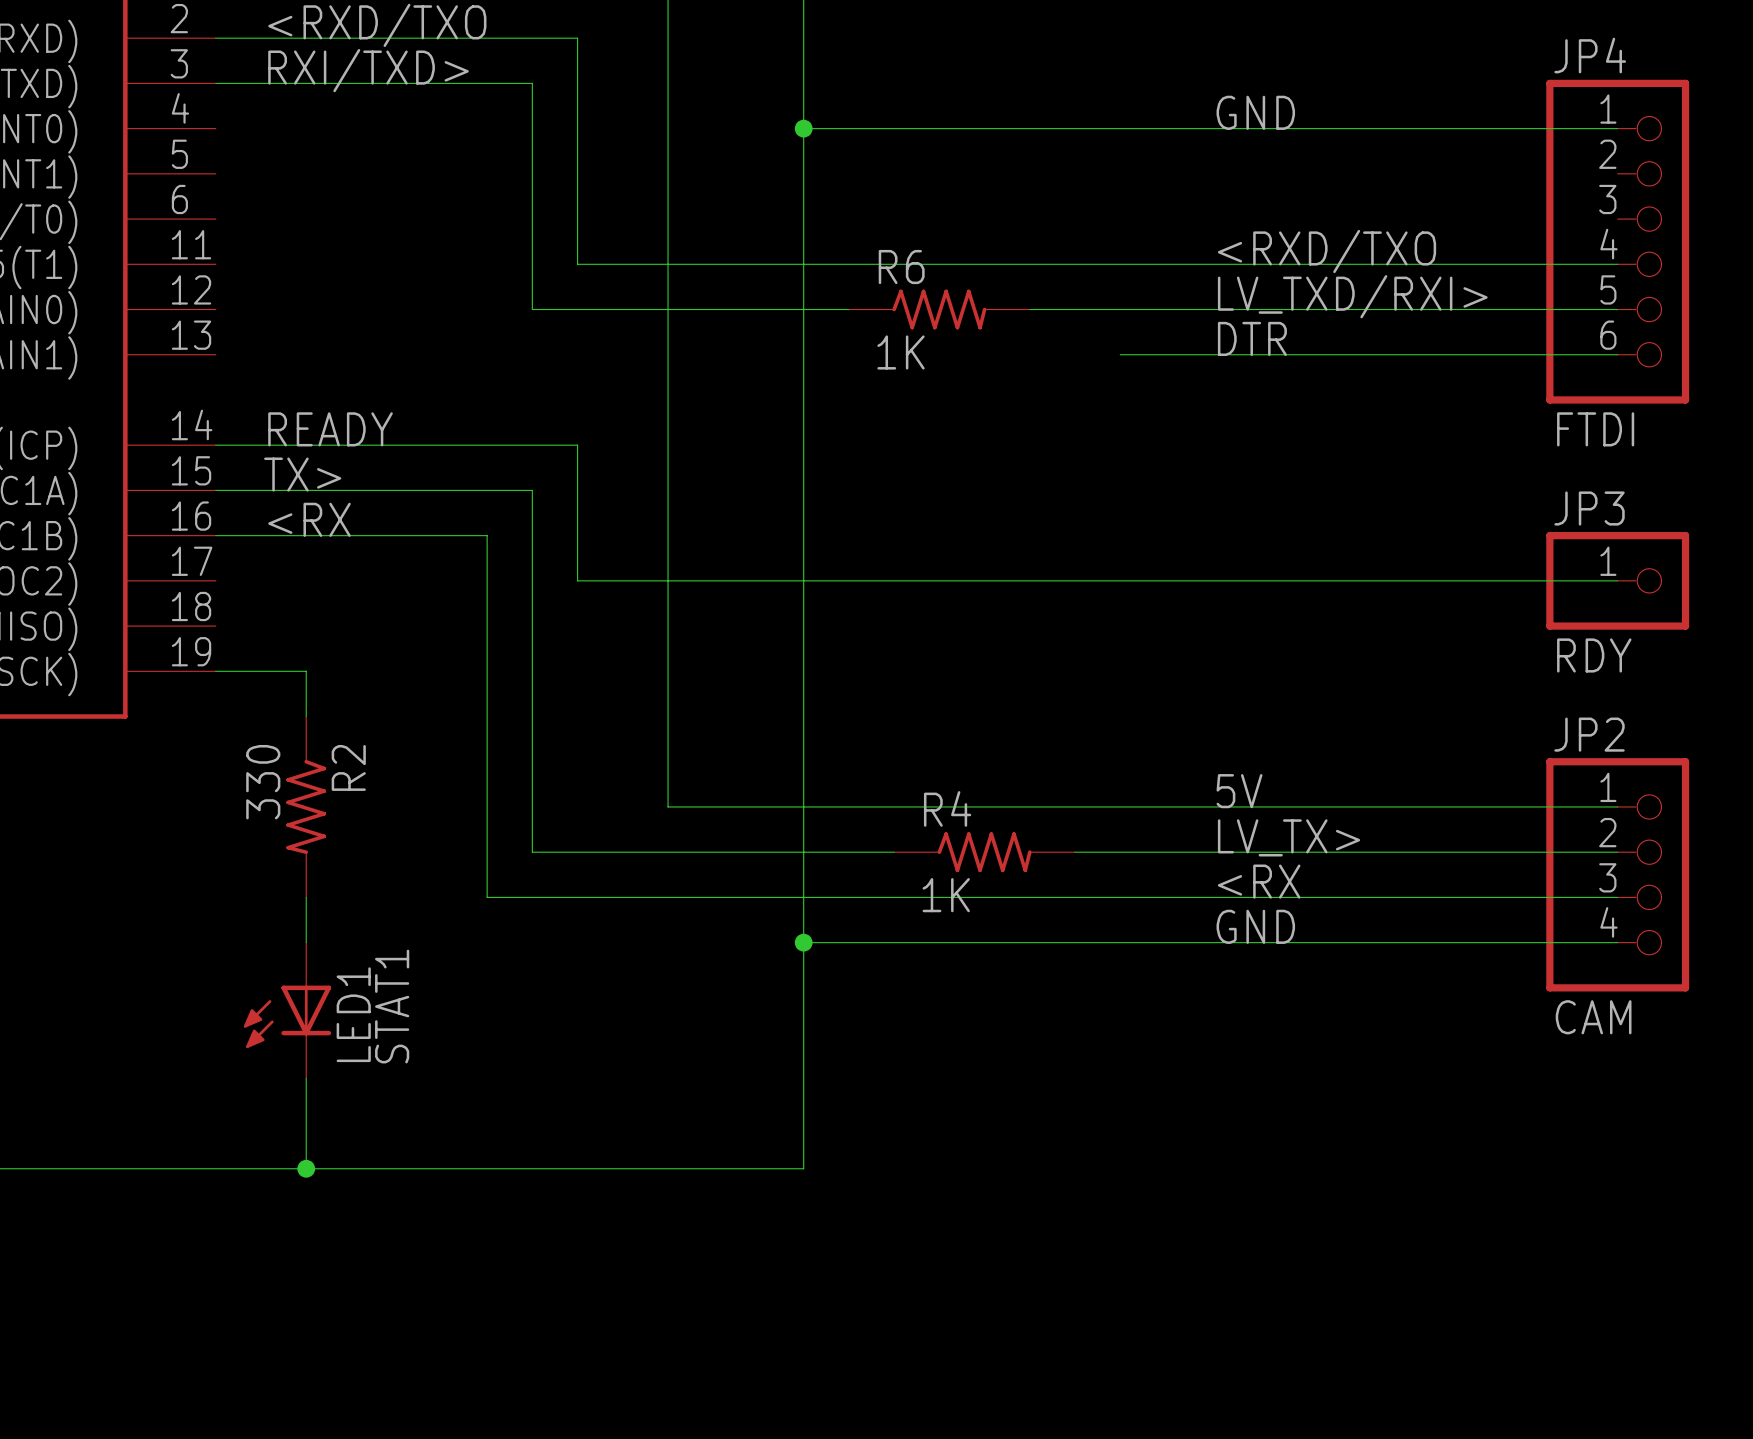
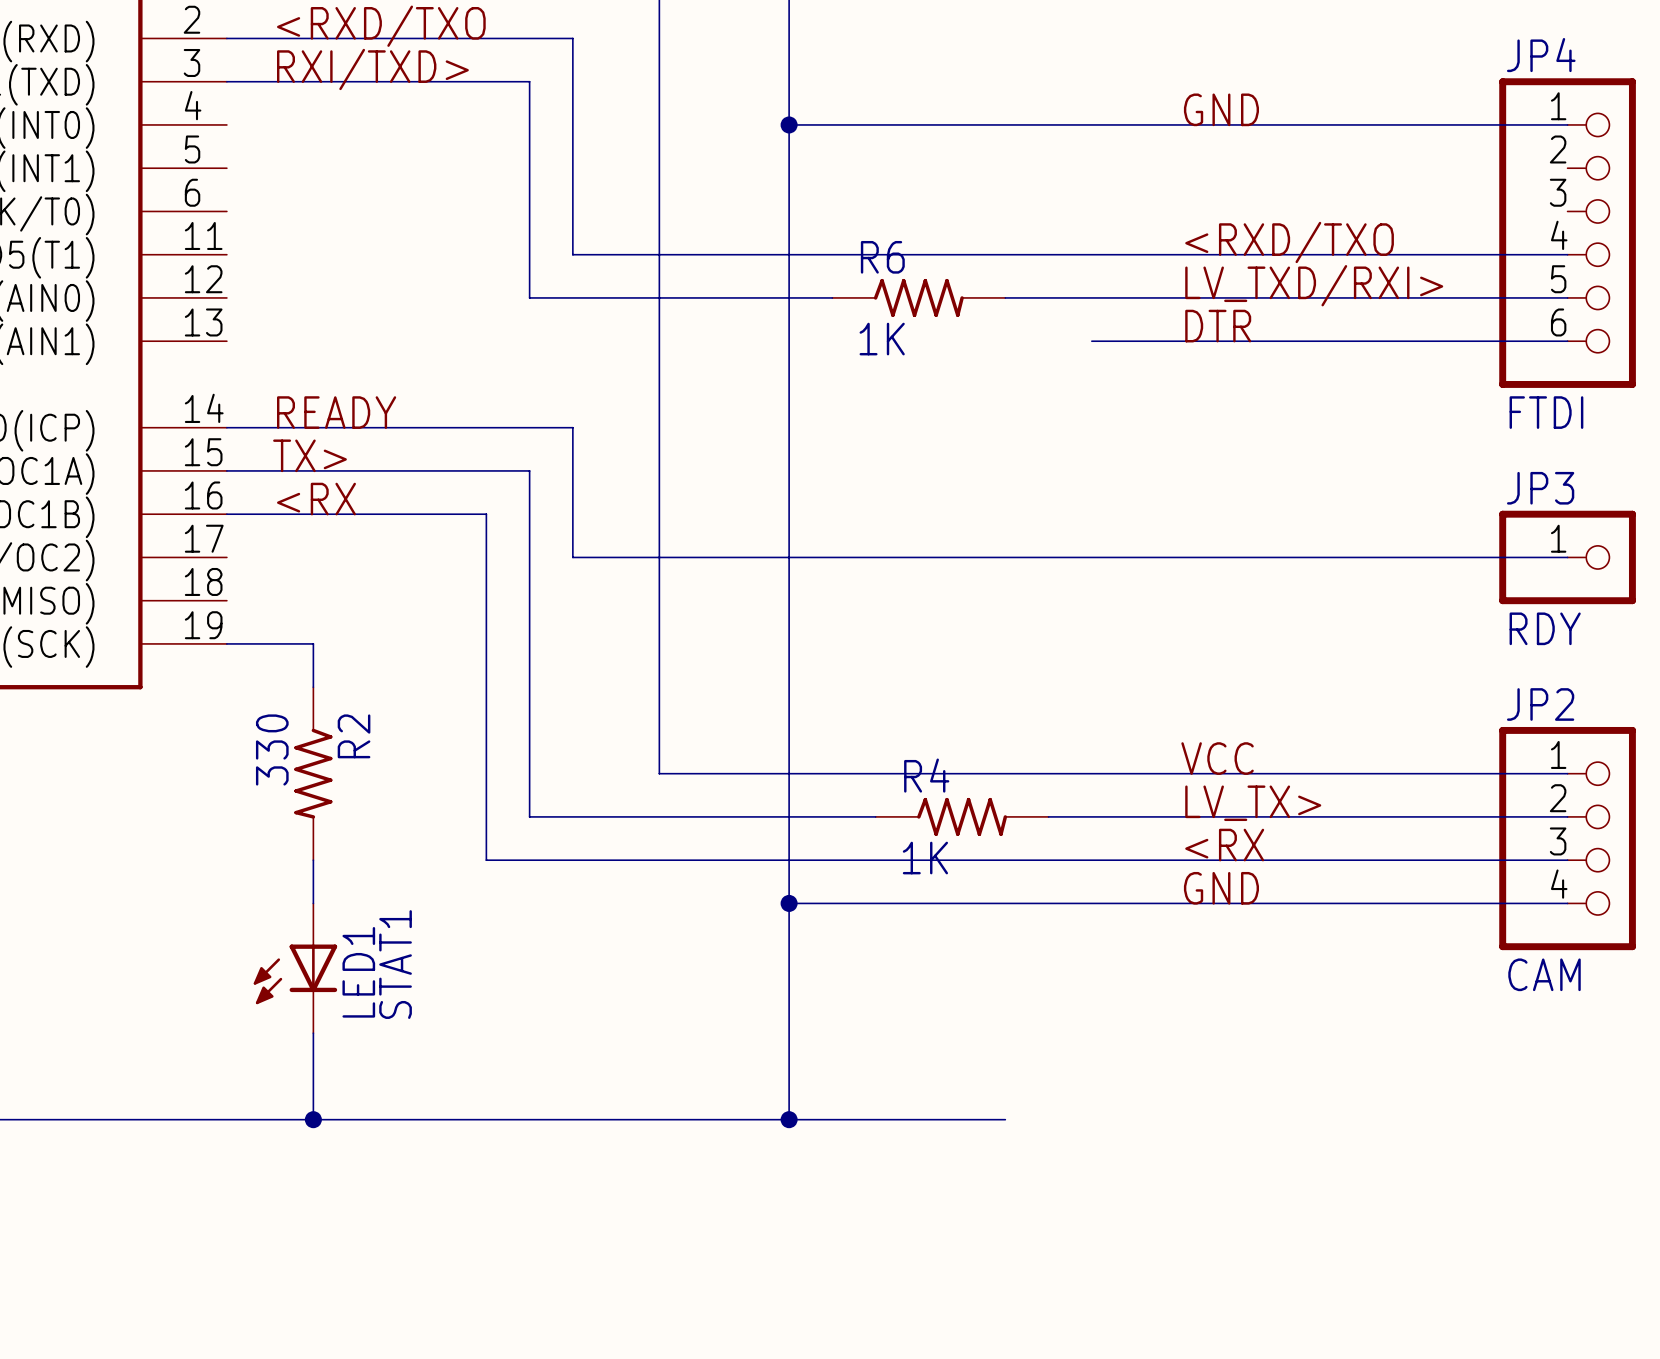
label: 5V (1239, 791) -> VCC (1217, 758)
wire: none -> (789, 1119) (1005, 1119)
junction: none -> (789, 1119)

